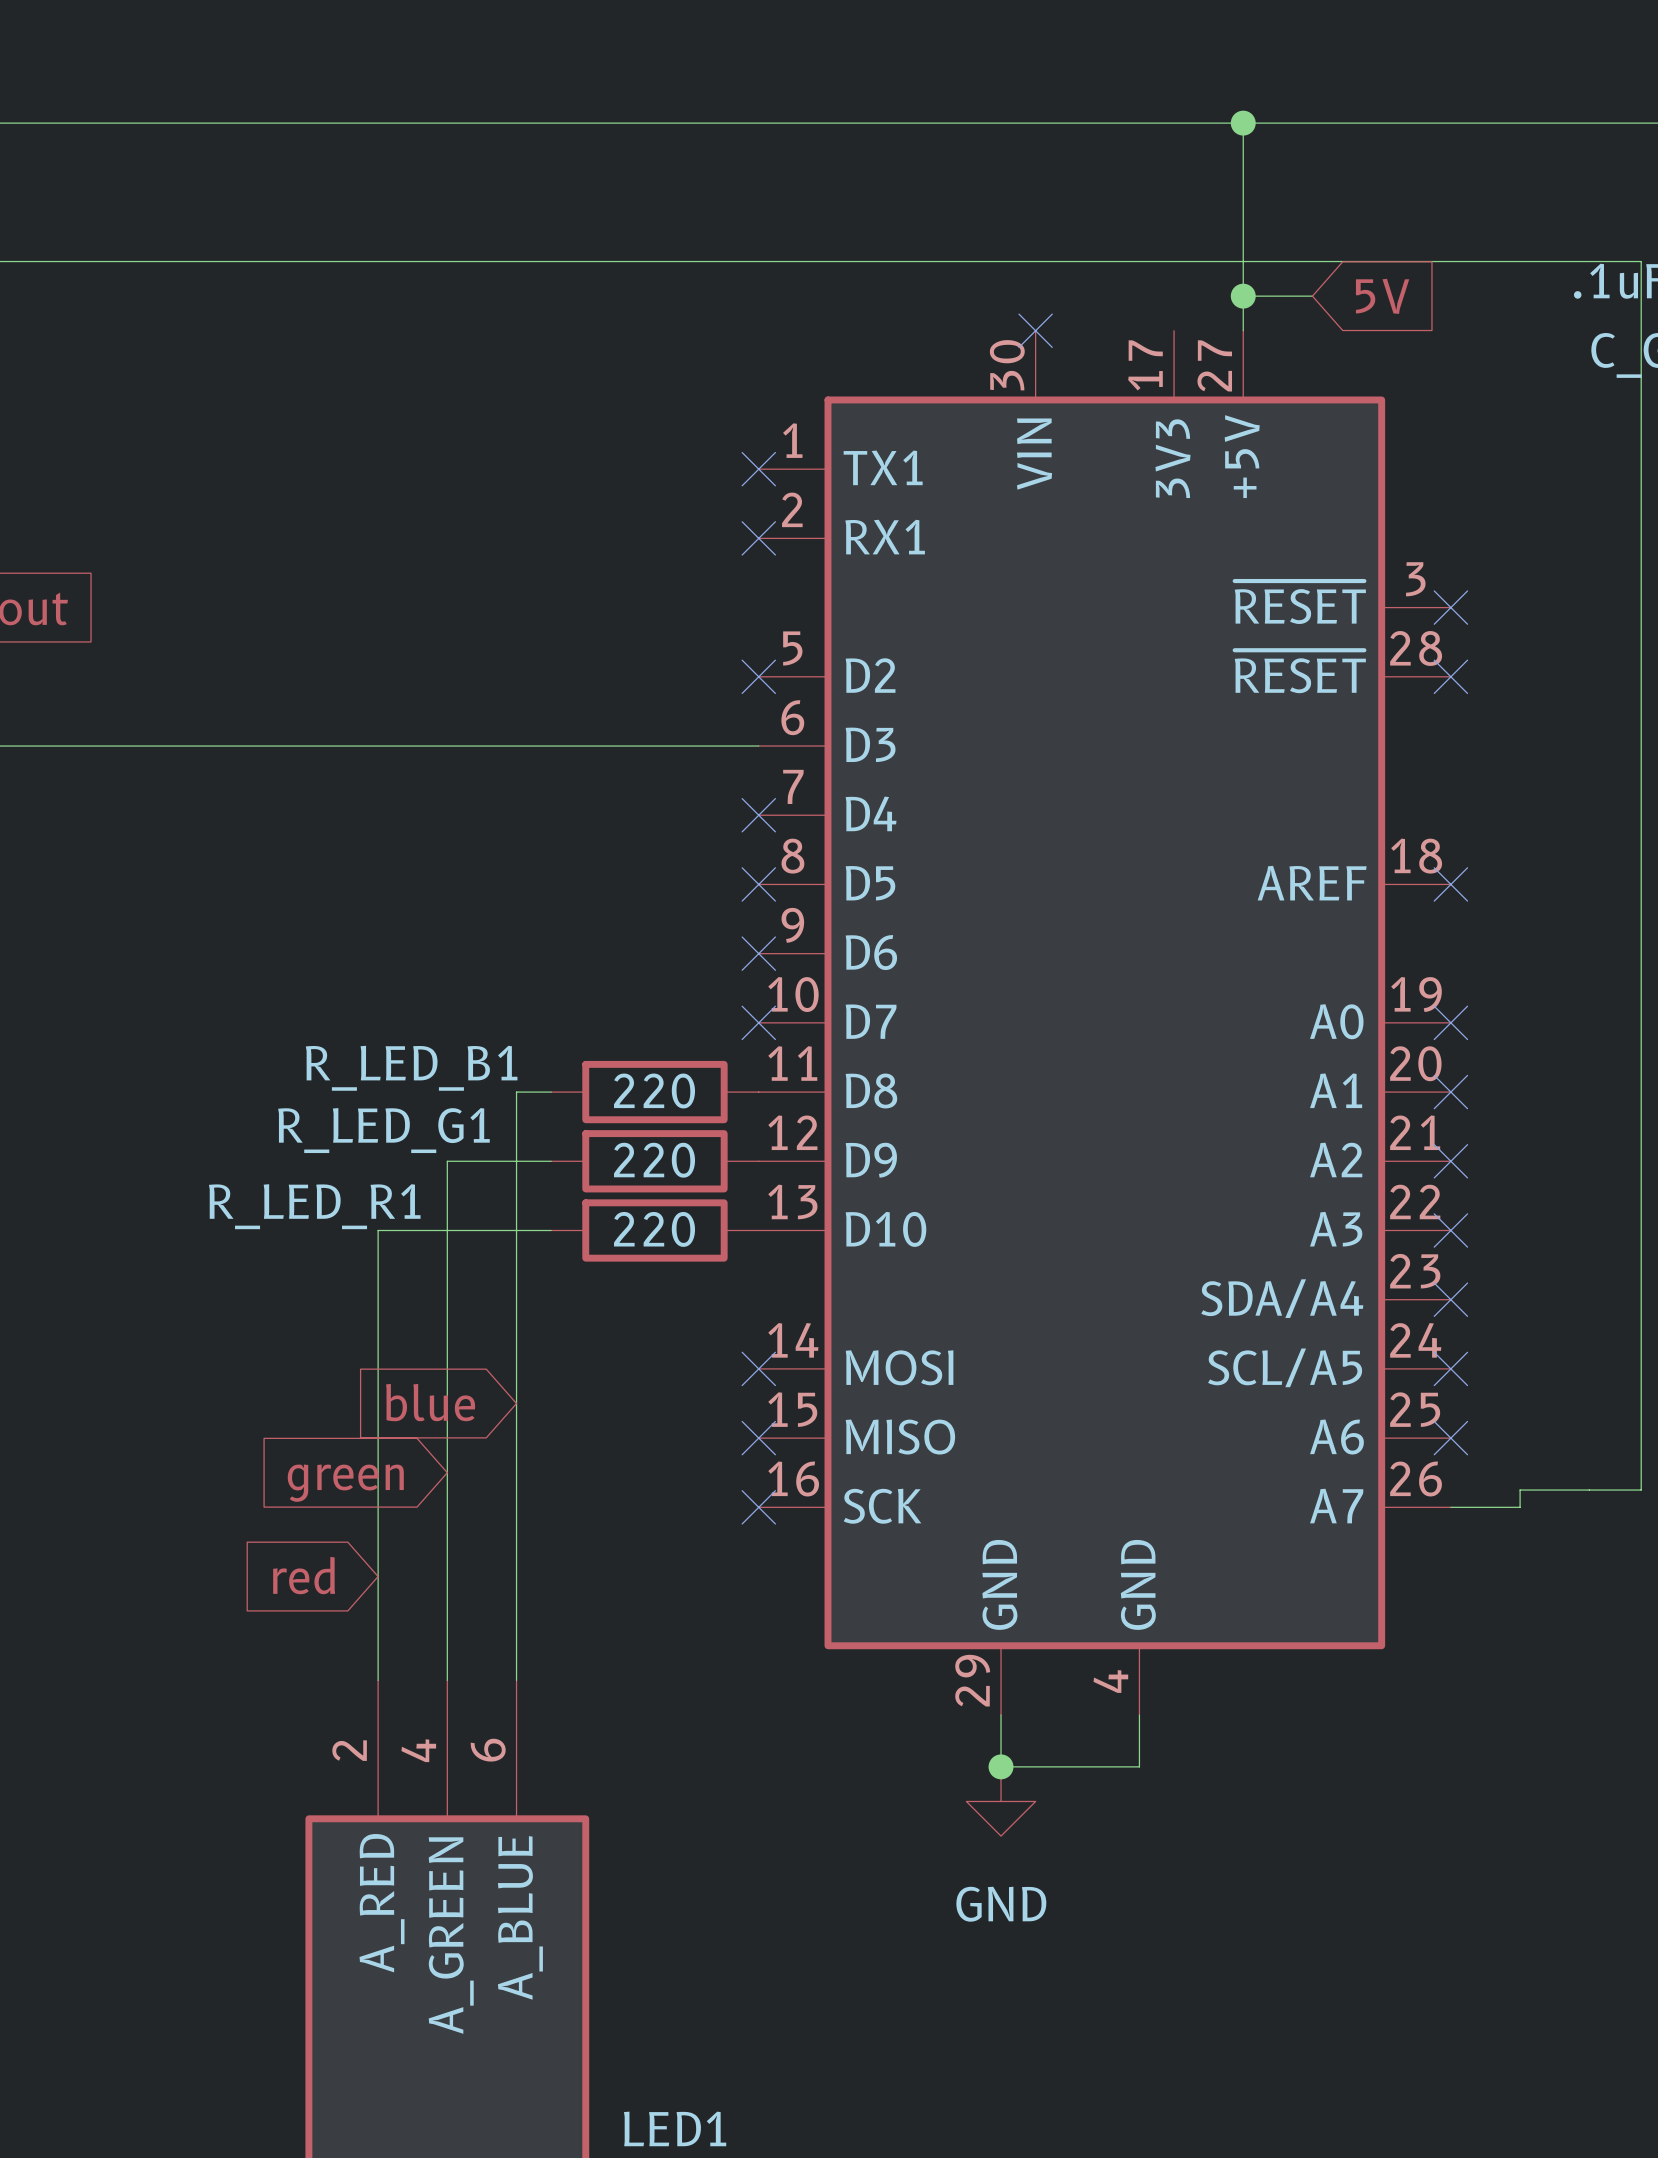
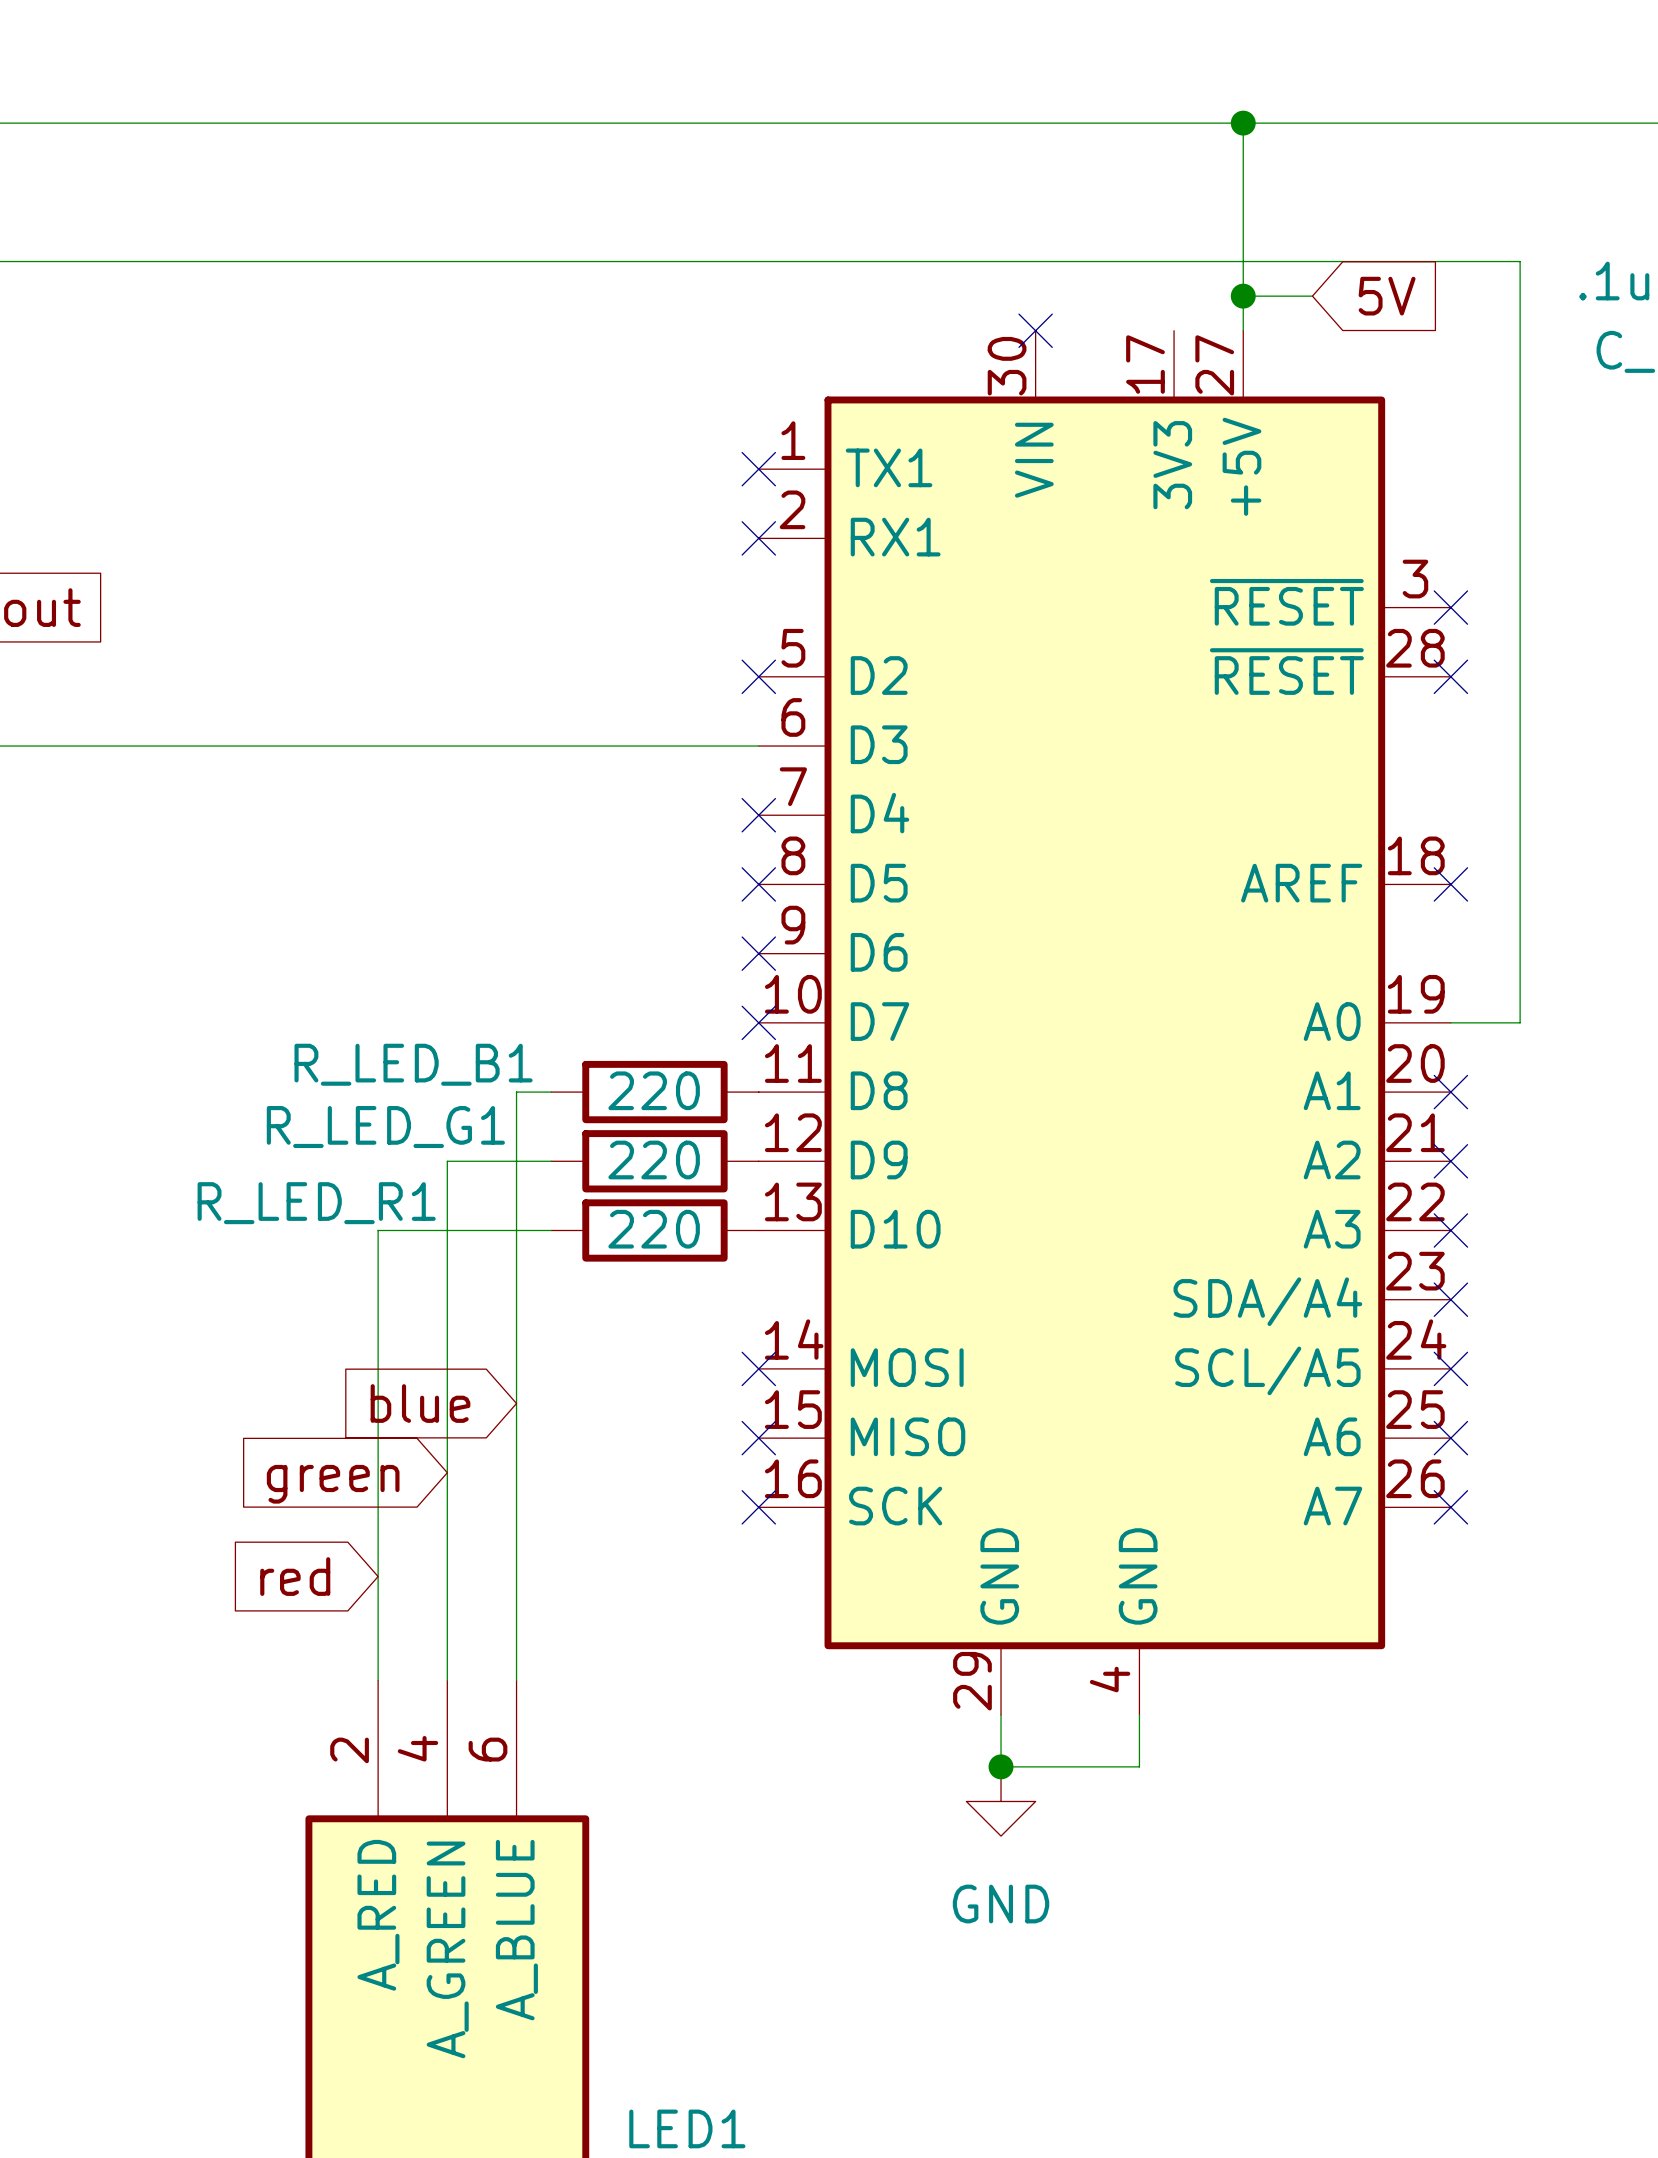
wire: (1520, 261) (1641, 261) (1641, 1490) (1520, 1490) (1520, 1507) (1450, 1507) -> (1520, 261) (1520, 1022) (1450, 1022)
no-connect mark: (1450, 1022) -> none
no-connect mark: none -> (1450, 1507)

